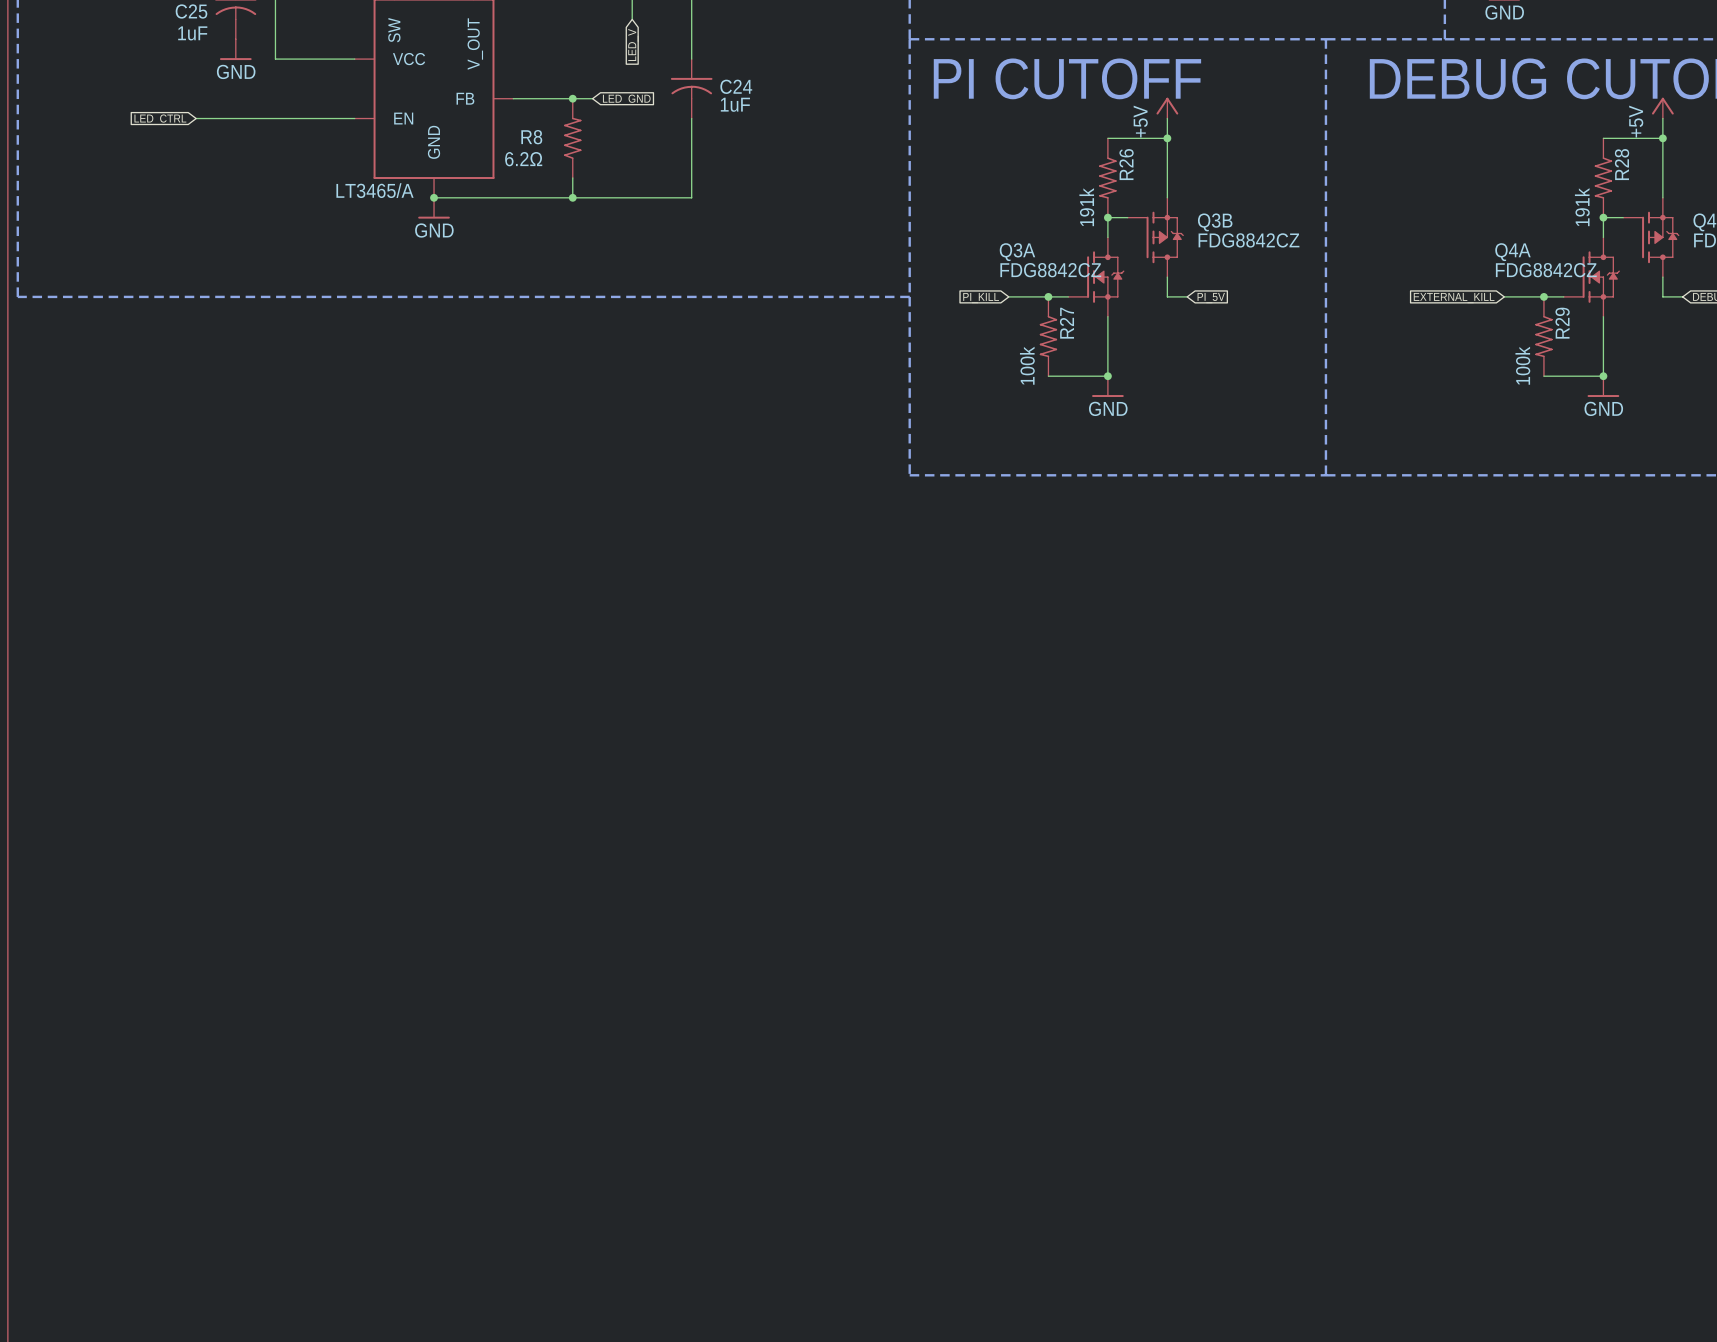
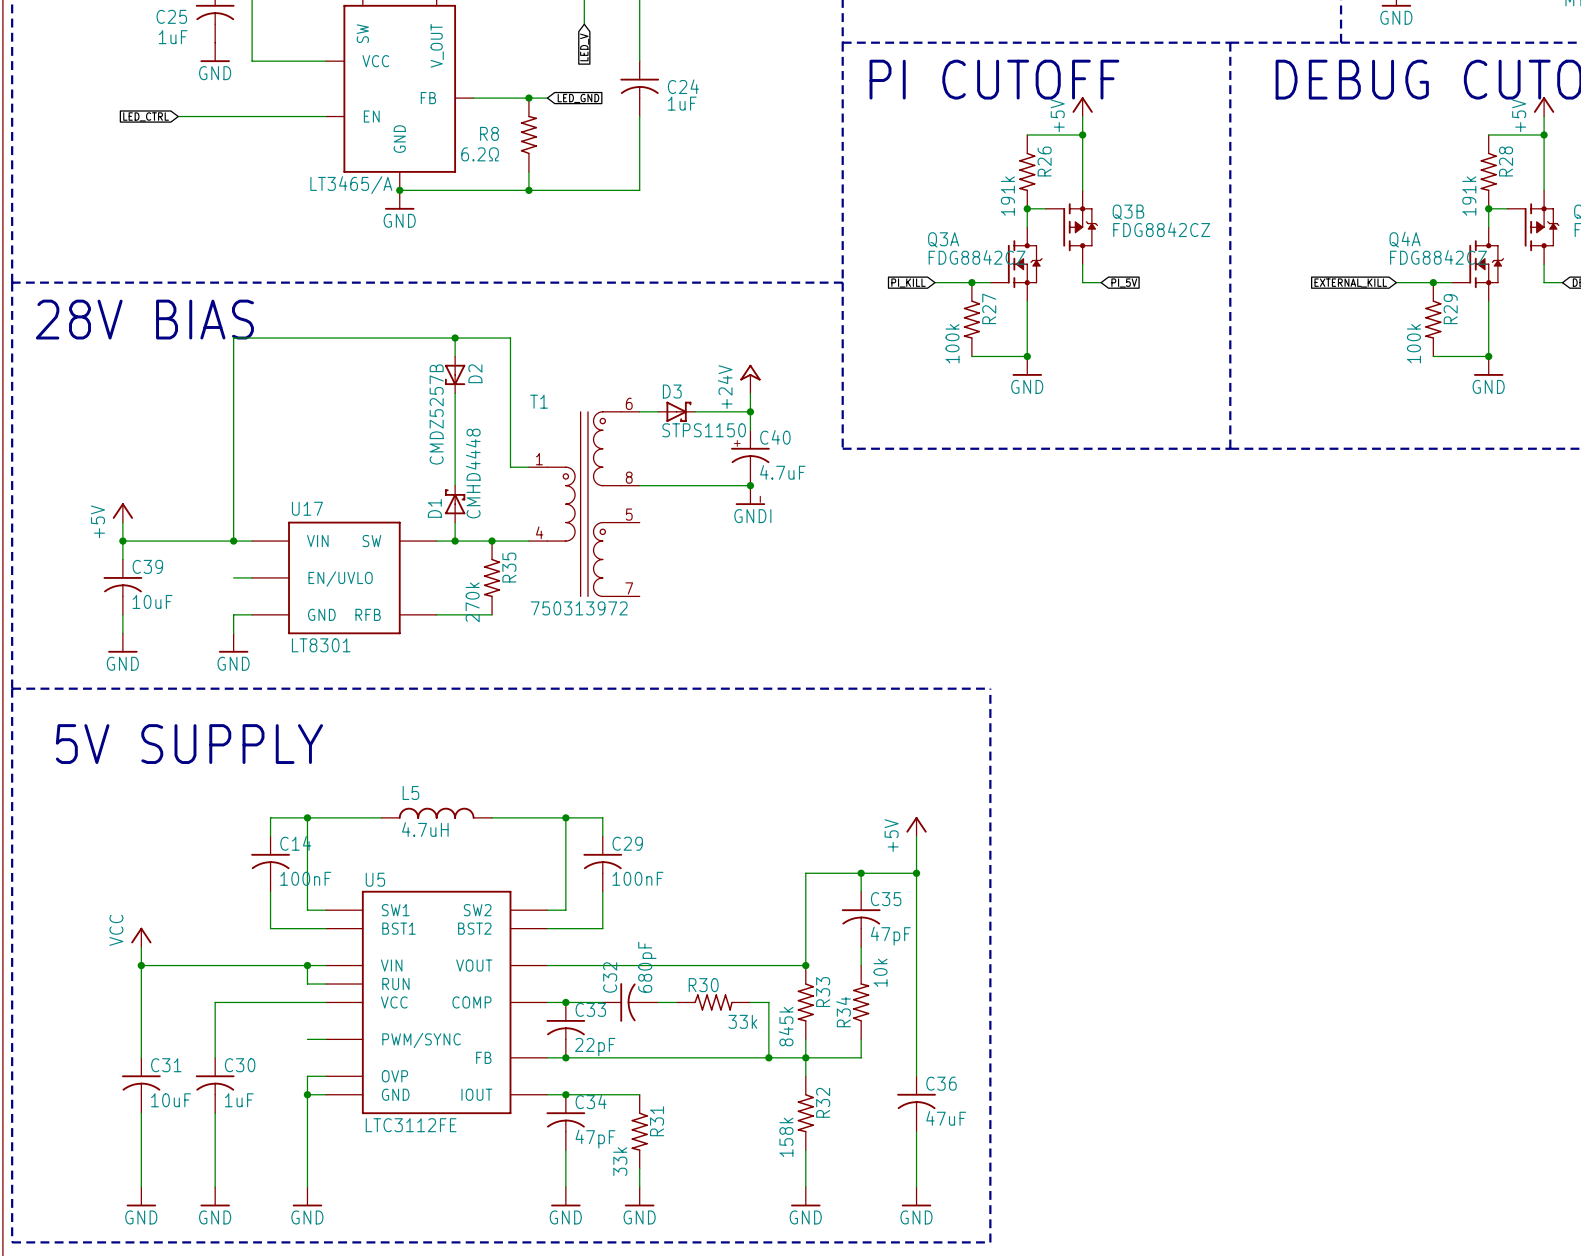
line: none -> (12, 282) (12, 1242) (990, 1242) (990, 688) (12, 688)
text: none -> 28V BIAS (144, 319)
wire: none -> (455, 338) (455, 356)
junction: none -> (455, 338)
D2: none -> CMDZ5257B (455, 374)
power symbol: none -> +24V (750, 379)
wire: none -> (455, 393) (455, 485)
wire: none -> (750, 393) (750, 430)
wire: none -> (639, 411) (658, 411)
D3: none -> STPS1150 (676, 411)
wire: none -> (695, 411) (750, 411)
junction: none -> (750, 411)
C40: none -> 4.7uF (750, 457)
wire: none -> (528, 467) (510, 467) (510, 338) (233, 338) (233, 541)
wire: none -> (639, 485) (750, 485)
junction: none -> (750, 485)
power symbol: none -> GNDI (750, 495)
D1: none -> CMHD4448 (455, 504)
T1: none -> 750313972 (584, 504)
power symbol: none -> +5V (122, 512)
wire: none -> (122, 522) (122, 559)
wire: none -> (455, 522) (455, 541)
wire: none -> (122, 541) (252, 541)
junction: none -> (122, 541)
junction: none -> (233, 541)
wire: none -> (436, 541) (528, 541)
junction: none -> (455, 541)
junction: none -> (492, 541)
wire: none -> (233, 577) (252, 577)
U17: none -> LT8301 (344, 577)
R35: none -> 270k (492, 577)
C39: none -> 10uF (122, 587)
wire: none -> (122, 614) (122, 633)
wire: none -> (252, 614) (233, 614) (233, 633)
wire: none -> (436, 614) (492, 614)
power symbol: none -> GND (122, 643)
power symbol: none -> GND (233, 643)
text: none -> 5V SUPPLY (189, 744)
L5: none -> 4.7uH (436, 813)
wire: none -> (307, 817) (307, 910) (325, 910)
junction: none -> (307, 817)
wire: none -> (381, 817) (270, 817) (270, 836)
wire: none -> (492, 817) (602, 817) (602, 836)
wire: none -> (565, 817) (565, 910) (547, 910)
junction: none -> (565, 817)
power symbol: none -> +5V (916, 826)
wire: none -> (916, 836) (916, 1076)
C14: none -> 100nF (270, 864)
C29: none -> 100nF (602, 864)
wire: none -> (861, 873) (861, 891)
junction: none -> (861, 873)
wire: none -> (916, 873) (805, 873) (805, 965) (547, 965)
junction: none -> (916, 873)
wire: none -> (270, 891) (270, 928) (325, 928)
wire: none -> (602, 891) (602, 928) (547, 928)
C35: none -> 47pF (861, 919)
power symbol: none -> VCC (141, 937)
wire: none -> (141, 947) (141, 1057)
wire: none -> (861, 947) (861, 965)
wire: none -> (141, 965) (325, 965)
junction: none -> (141, 965)
wire: none -> (307, 965) (307, 984) (325, 984)
junction: none -> (307, 965)
junction: none -> (805, 965)
wire: none -> (325, 1002) (215, 1002) (215, 1057)
U5: none -> LTC3112FE (436, 1002)
wire: none -> (547, 1002) (602, 1002)
junction: none -> (565, 1002)
C32: none -> 680pF (630, 1002)
wire: none -> (658, 1002) (676, 1002)
R30: none -> 33k (713, 1002)
wire: none -> (750, 1002) (768, 1002) (768, 1057)
R33: none -> 845k (805, 1002)
R34: none -> 10k (861, 1002)
C33: none -> 22pF (565, 1030)
wire: none -> (307, 1039) (325, 1039)
wire: none -> (805, 1039) (805, 1076)
wire: none -> (861, 1039) (861, 1057) (547, 1057)
junction: none -> (565, 1057)
junction: none -> (768, 1057)
junction: none -> (805, 1057)
wire: none -> (325, 1076) (307, 1076) (307, 1187)
C31: none -> 10uF (141, 1085)
C30: none -> 1uF (215, 1085)
wire: none -> (307, 1094) (325, 1094)
junction: none -> (307, 1094)
wire: none -> (547, 1094) (639, 1094)
junction: none -> (565, 1094)
C36: none -> 47uF (916, 1103)
wire: none -> (141, 1113) (141, 1187)
wire: none -> (215, 1113) (215, 1187)
R32: none -> 158k (805, 1113)
C34: none -> 47pF (565, 1122)
R31: none -> 33k (639, 1131)
wire: none -> (916, 1131) (916, 1187)
wire: none -> (565, 1150) (565, 1187)
wire: none -> (805, 1150) (805, 1187)
wire: none -> (639, 1168) (639, 1187)
power symbol: none -> GND (141, 1196)
power symbol: none -> GND (215, 1196)
power symbol: none -> GND (307, 1196)
power symbol: none -> GND (565, 1196)
power symbol: none -> GND (639, 1196)
power symbol: none -> GND (805, 1196)
power symbol: none -> GND (916, 1196)

